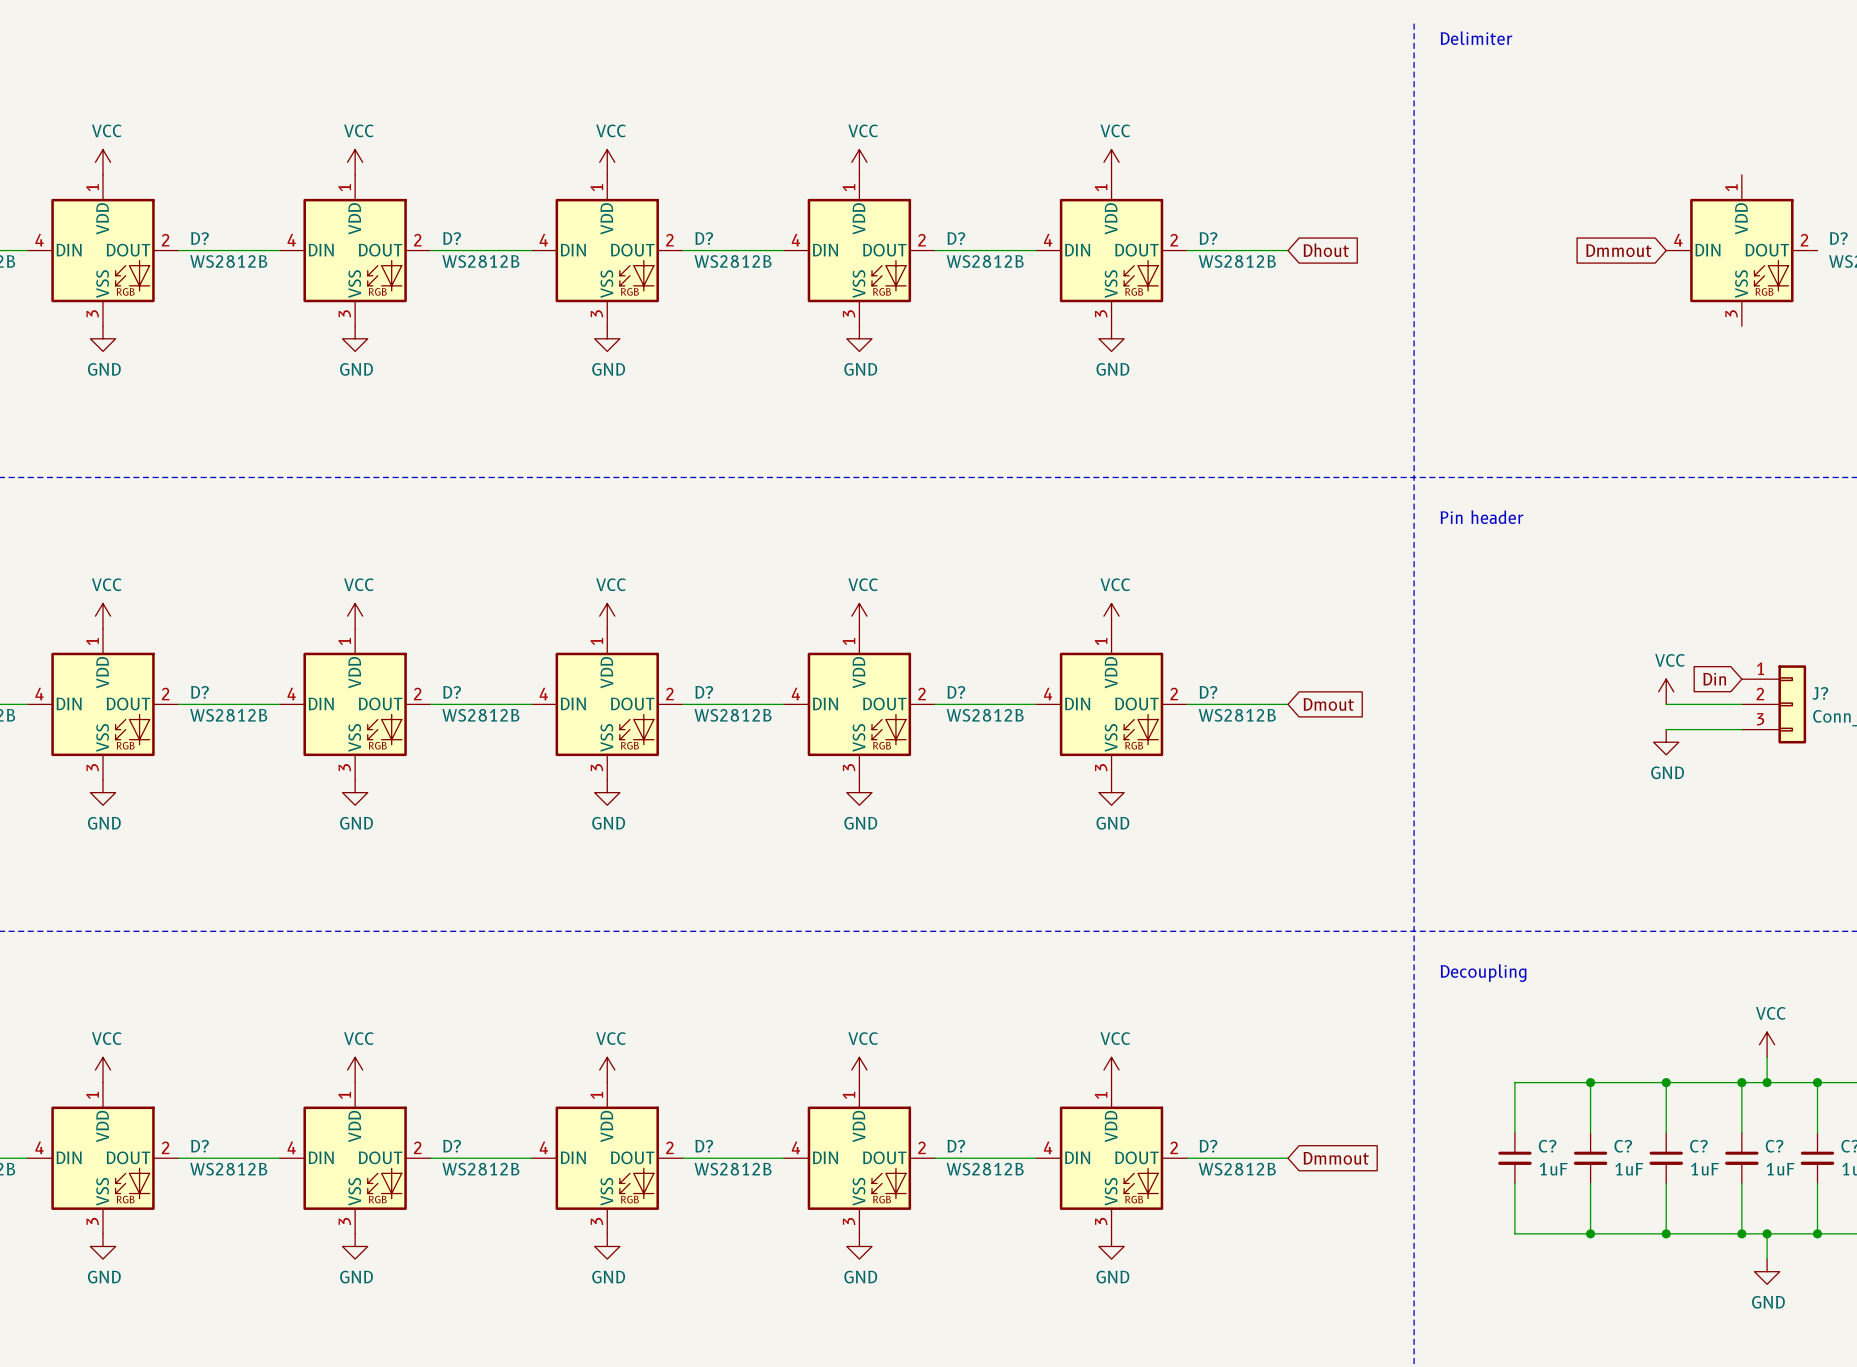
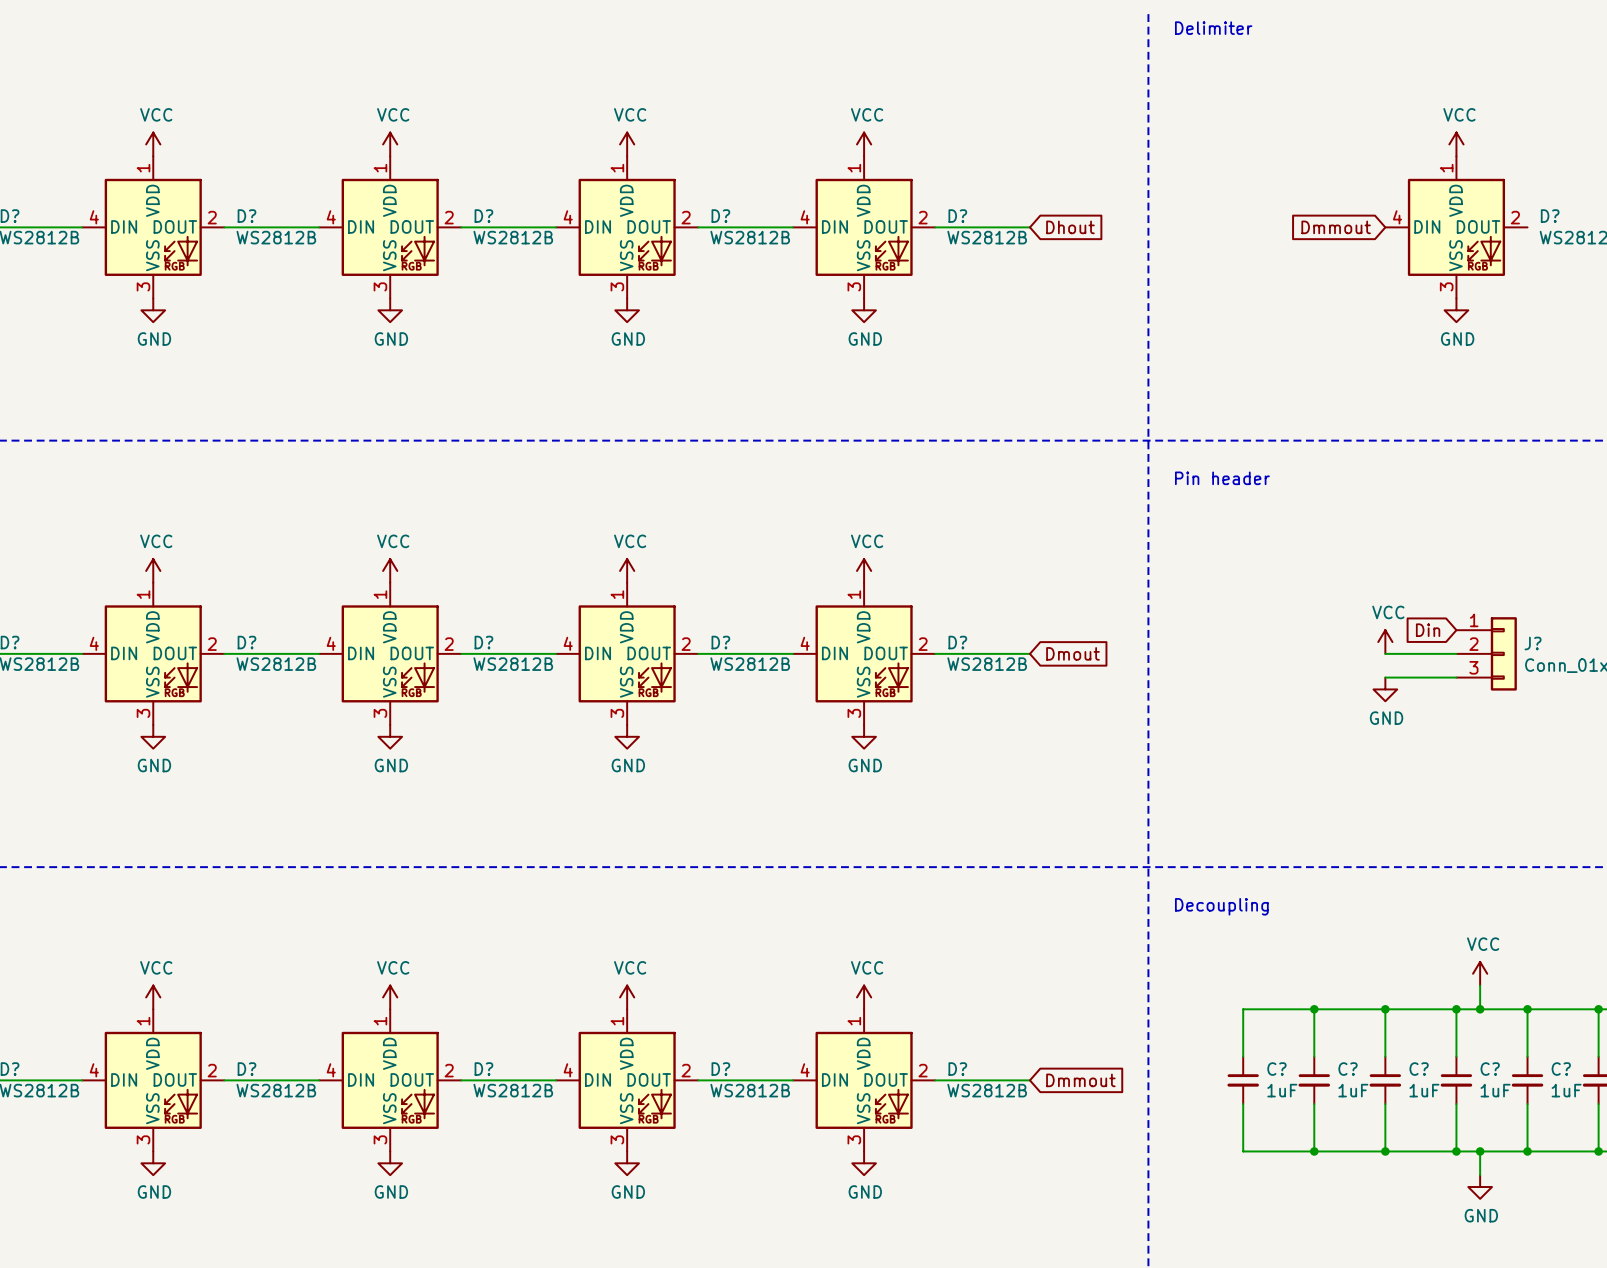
power symbol: none -> VCC (1456, 144)
power symbol: none -> GND (1456, 310)

